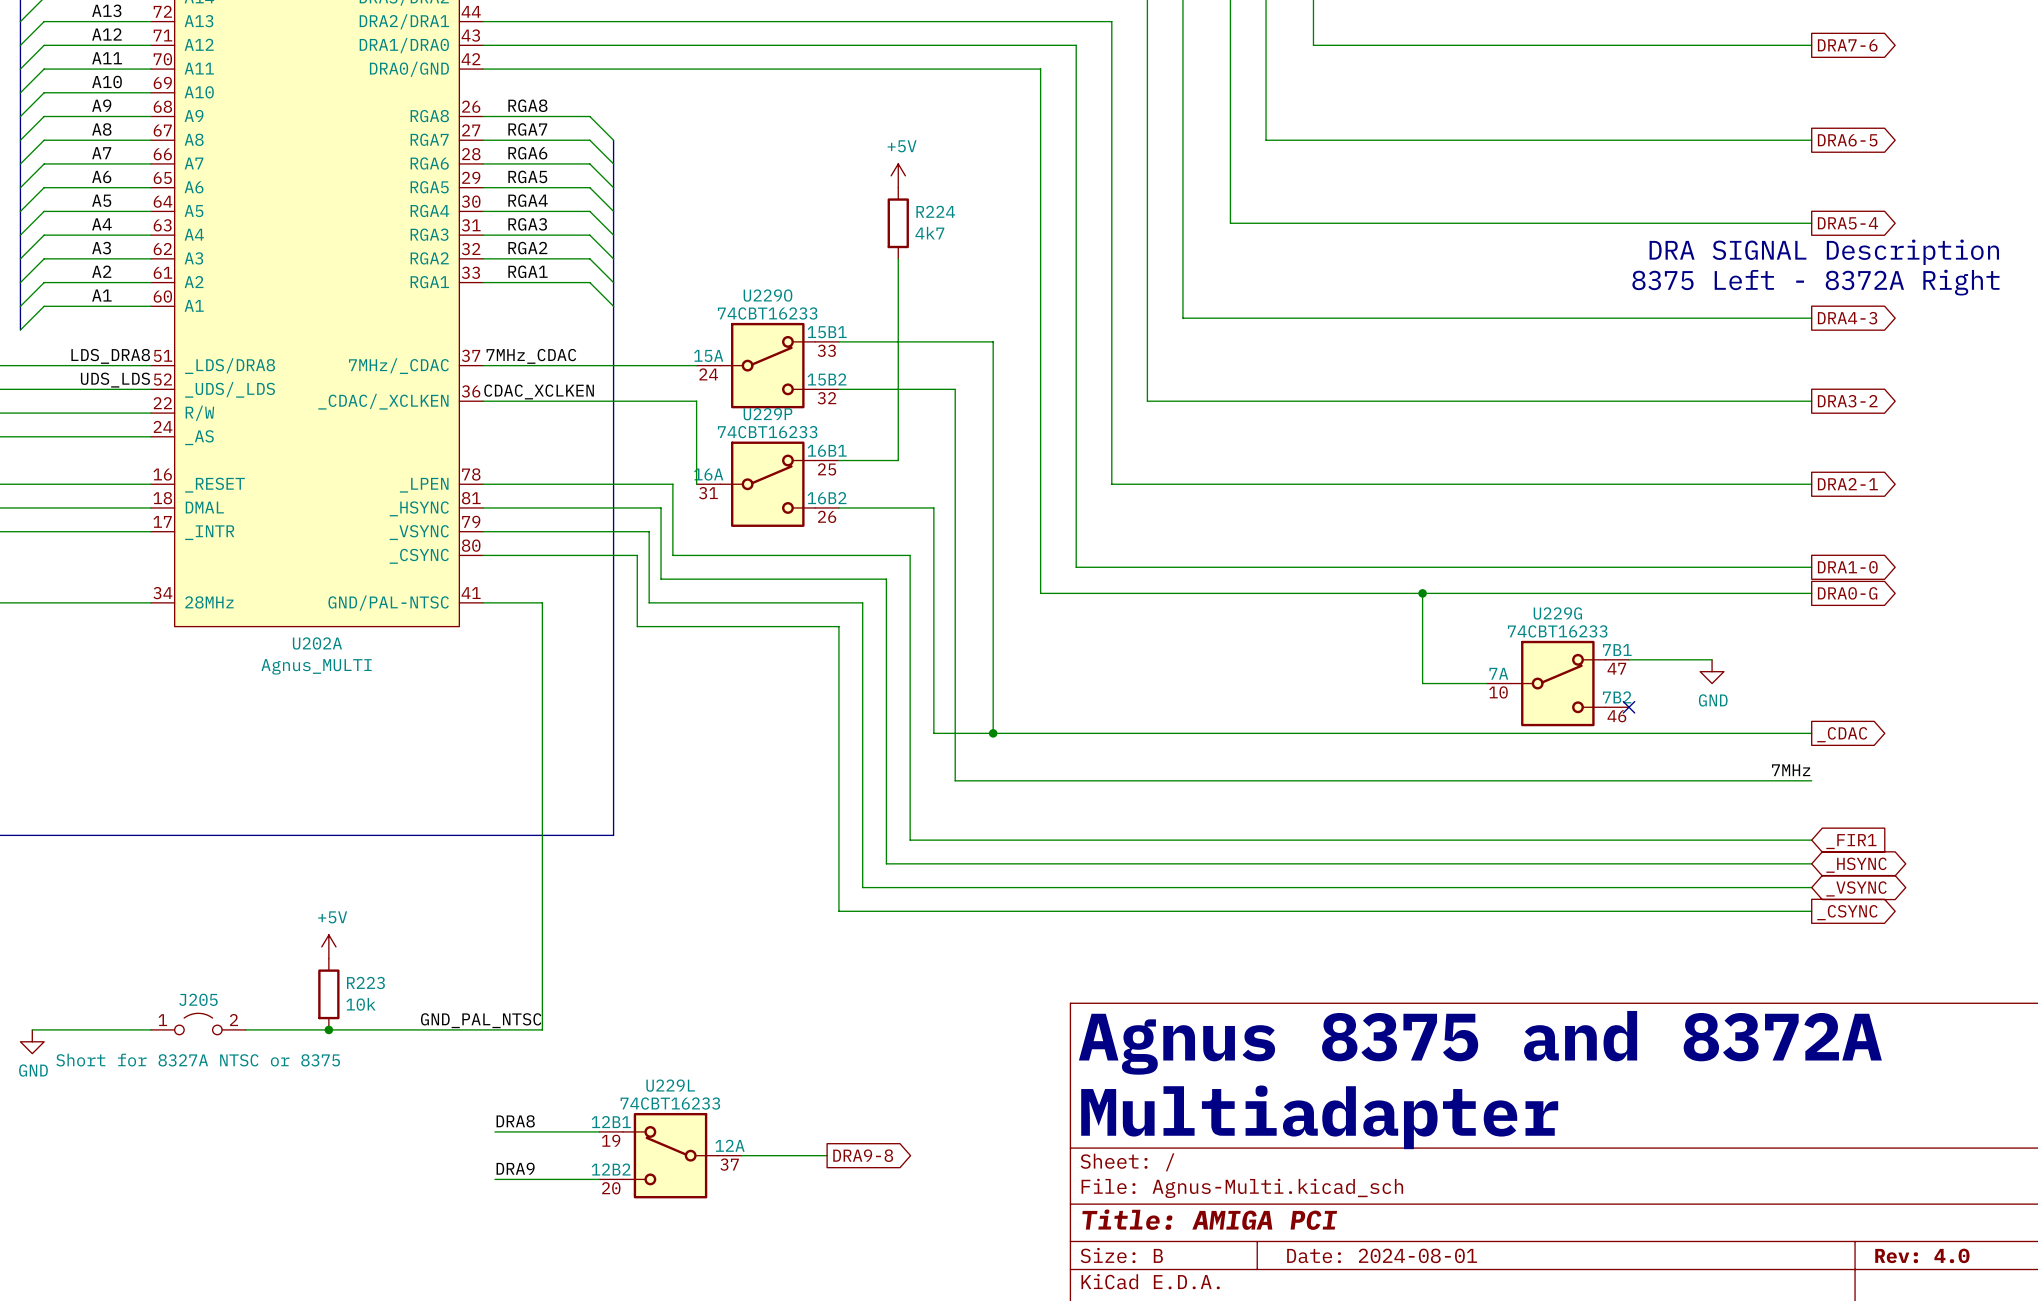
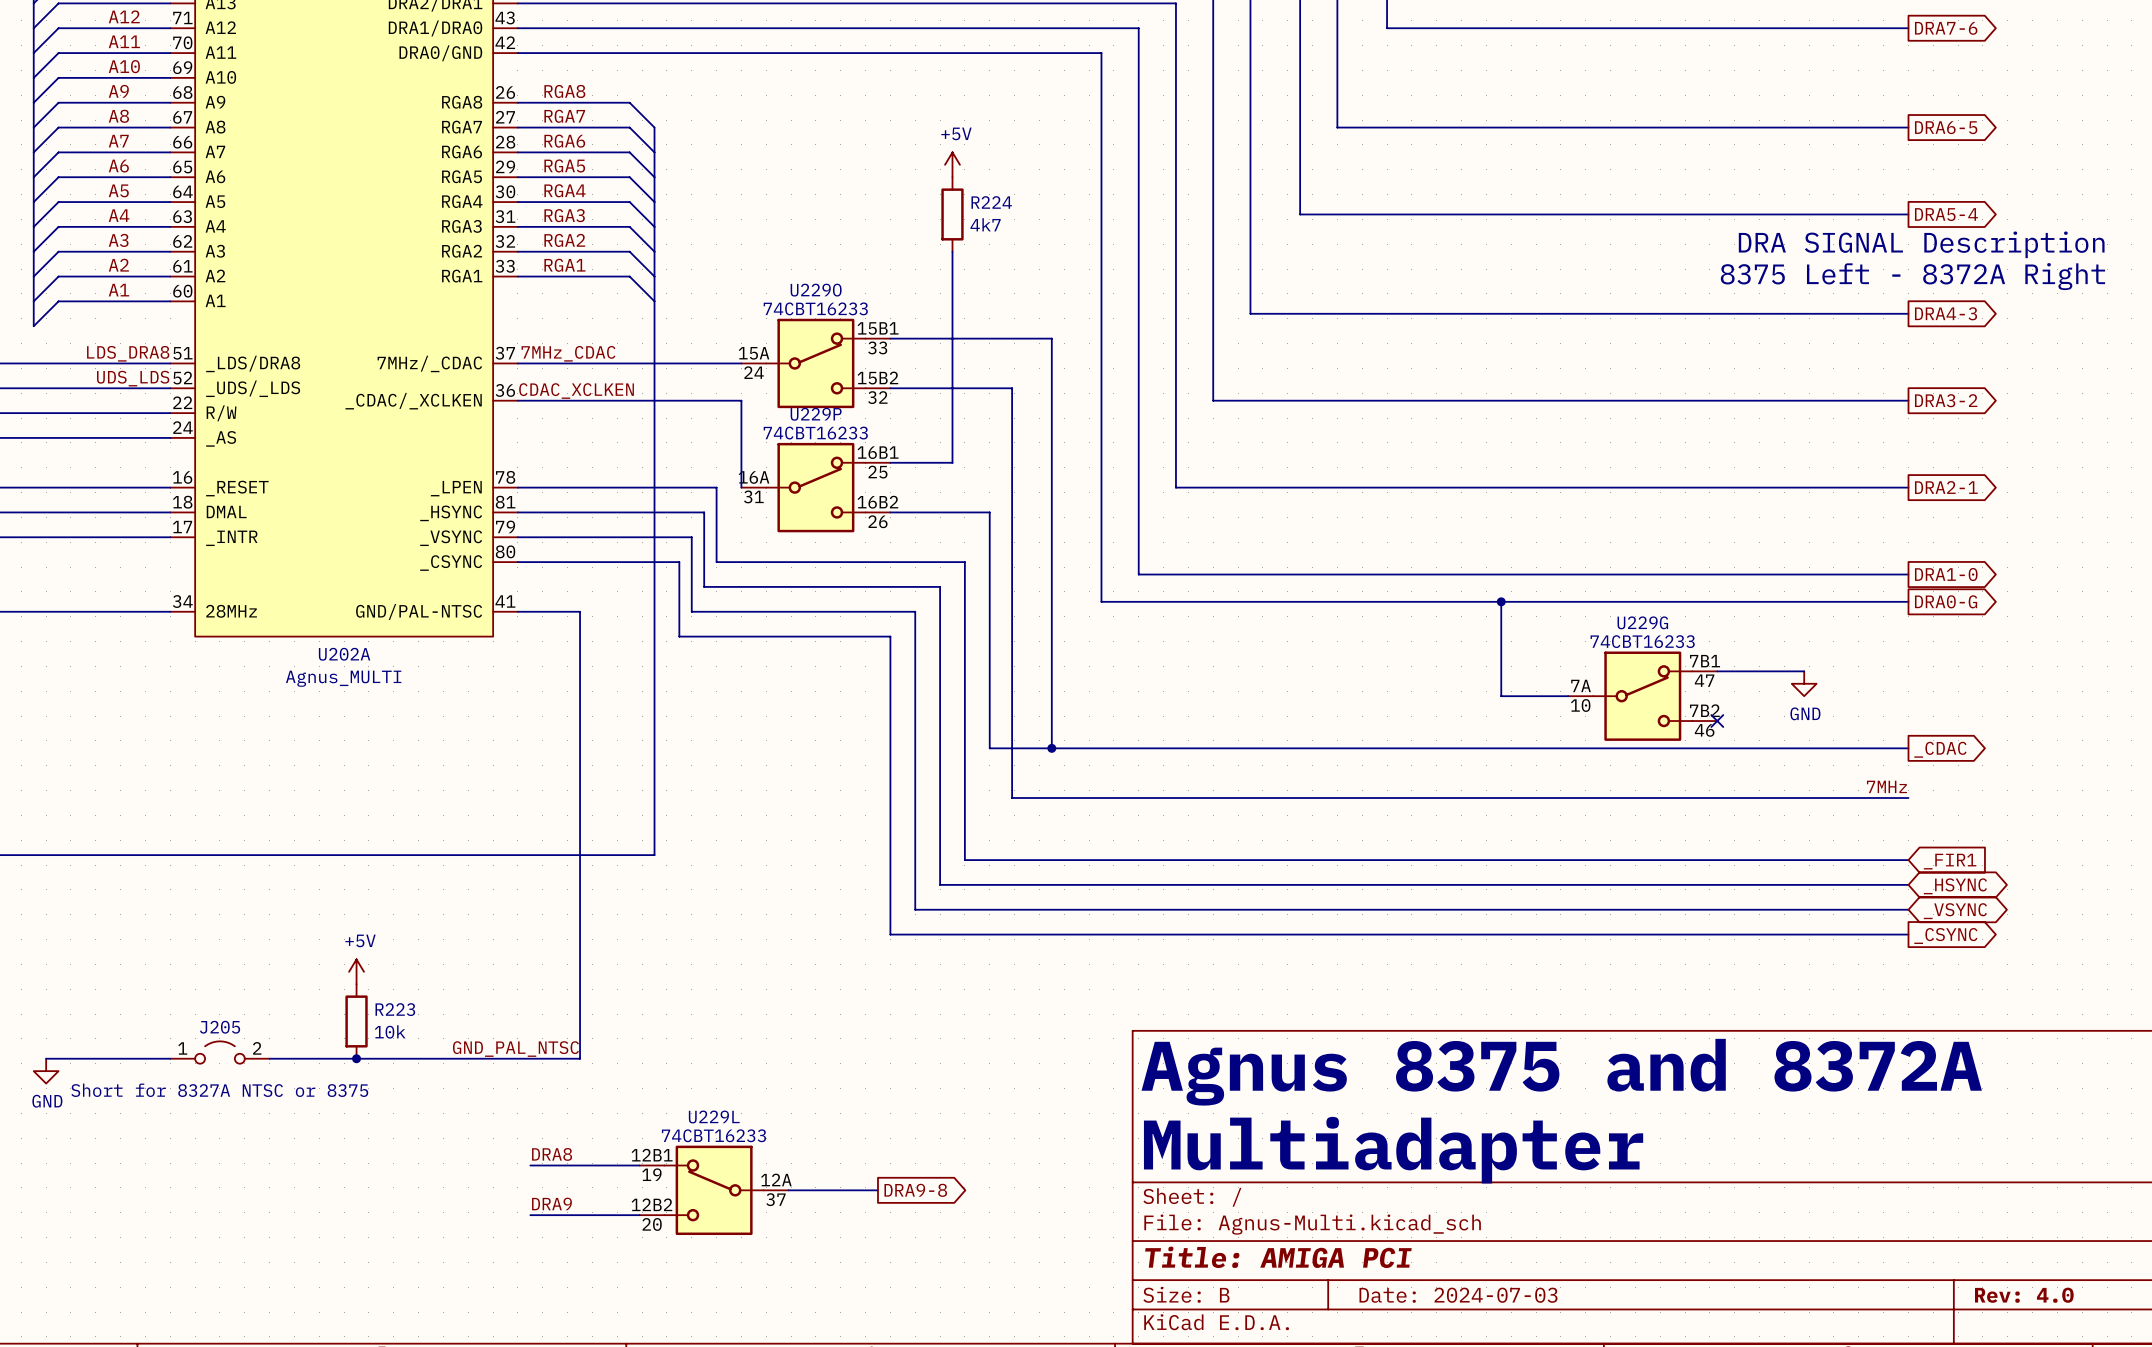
title block: Date: 2024-08-01 (1382, 1255) -> Date: 2024-07-03 (1458, 1295)

